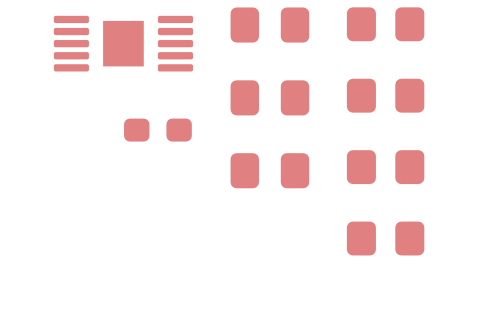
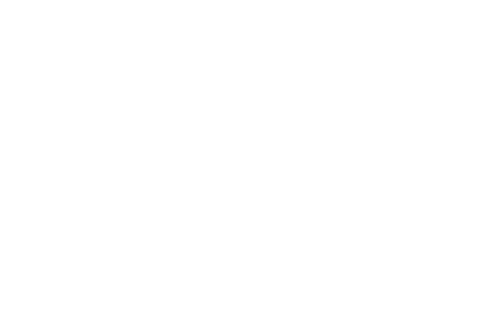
part: (385, 24) -> none
part: (269, 25) -> none
part: (123, 43) -> none
part: (385, 95) -> none
part: (269, 97) -> none
part: (157, 130) -> none
part: (385, 167) -> none
part: (269, 170) -> none
part: (385, 238) -> none

